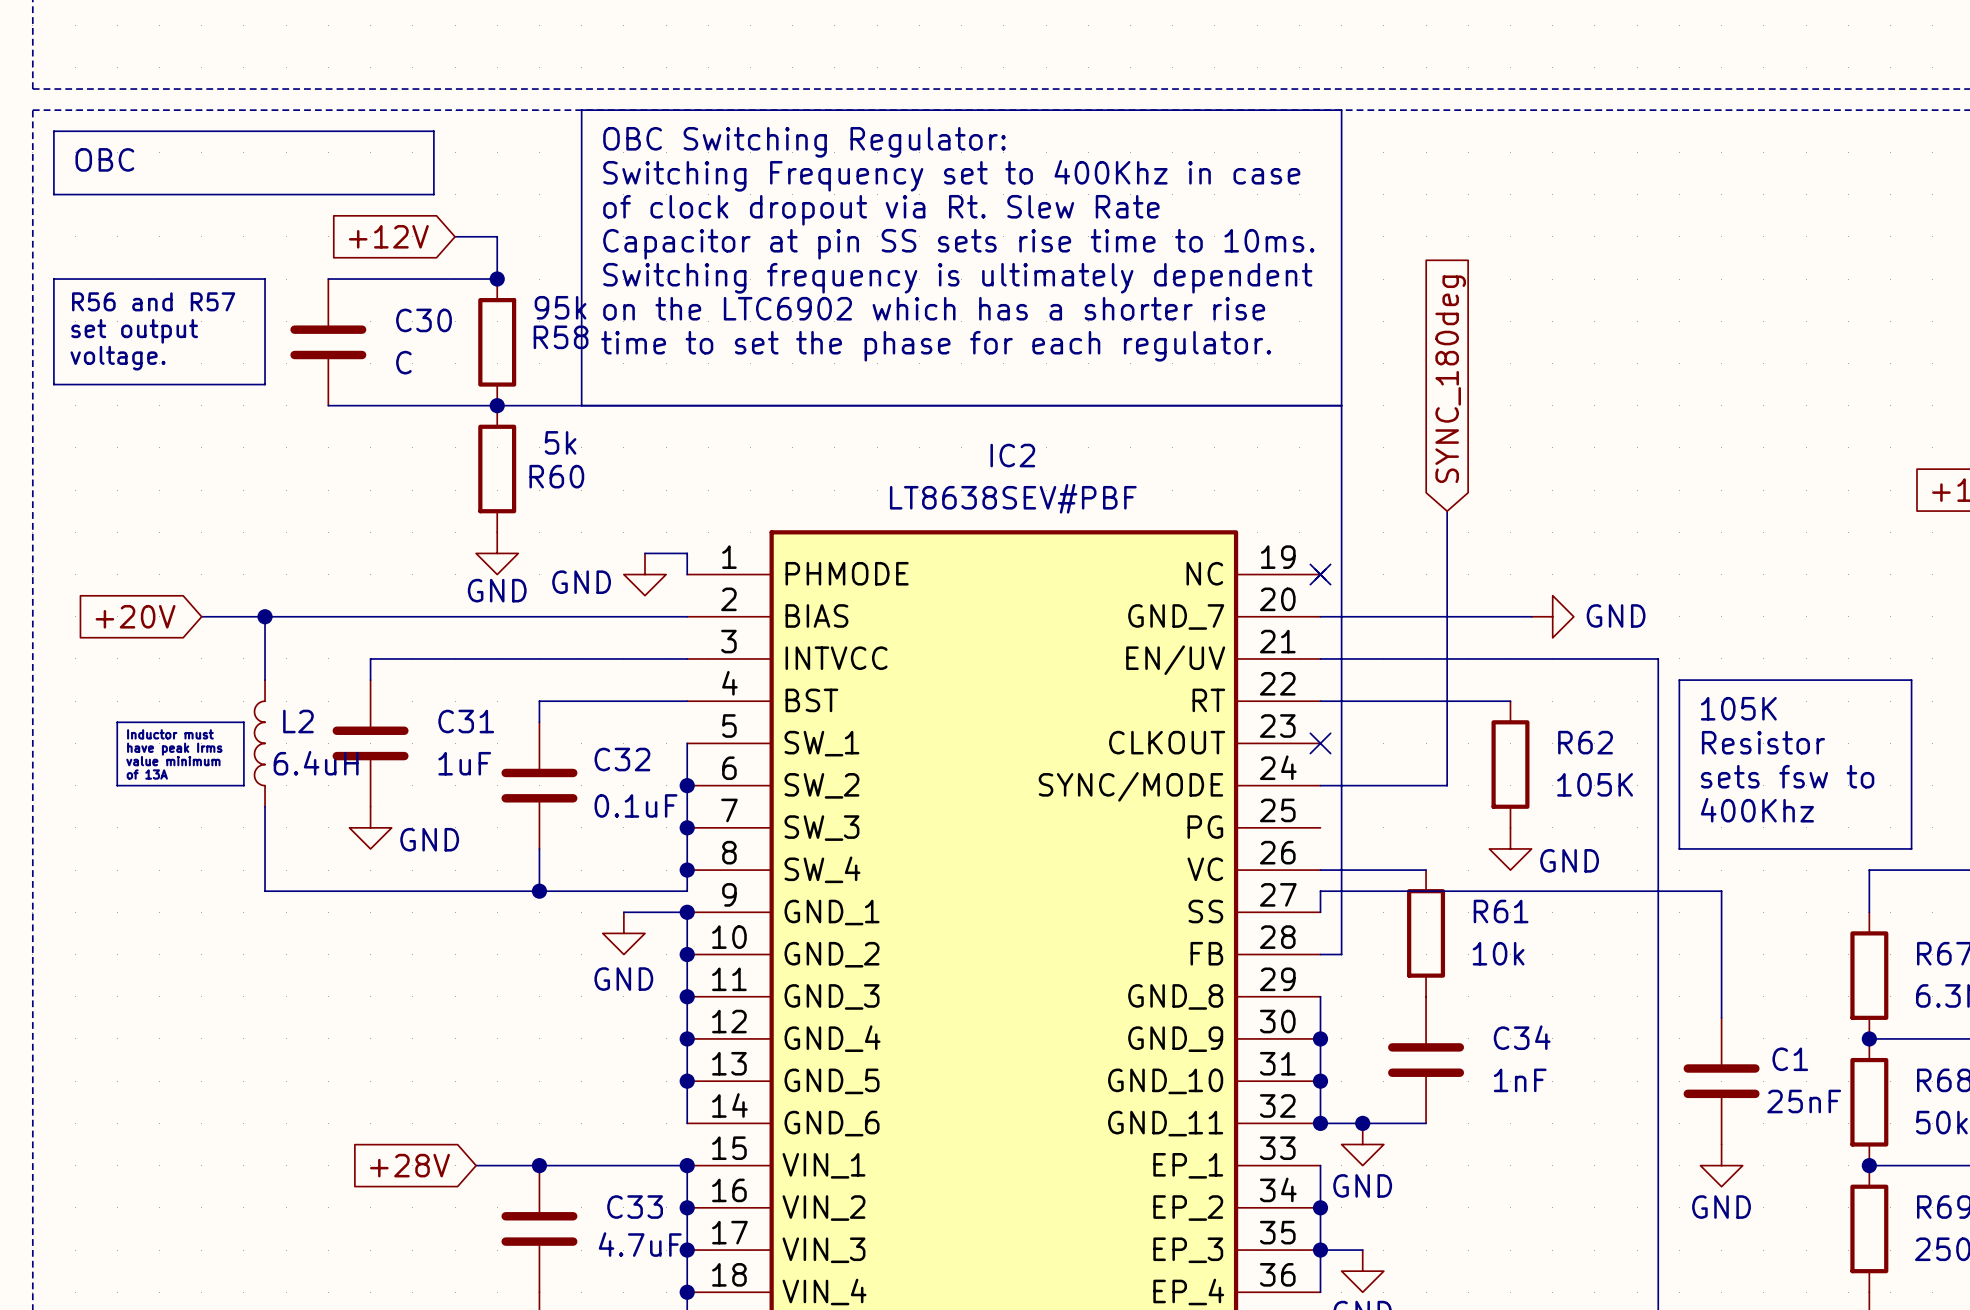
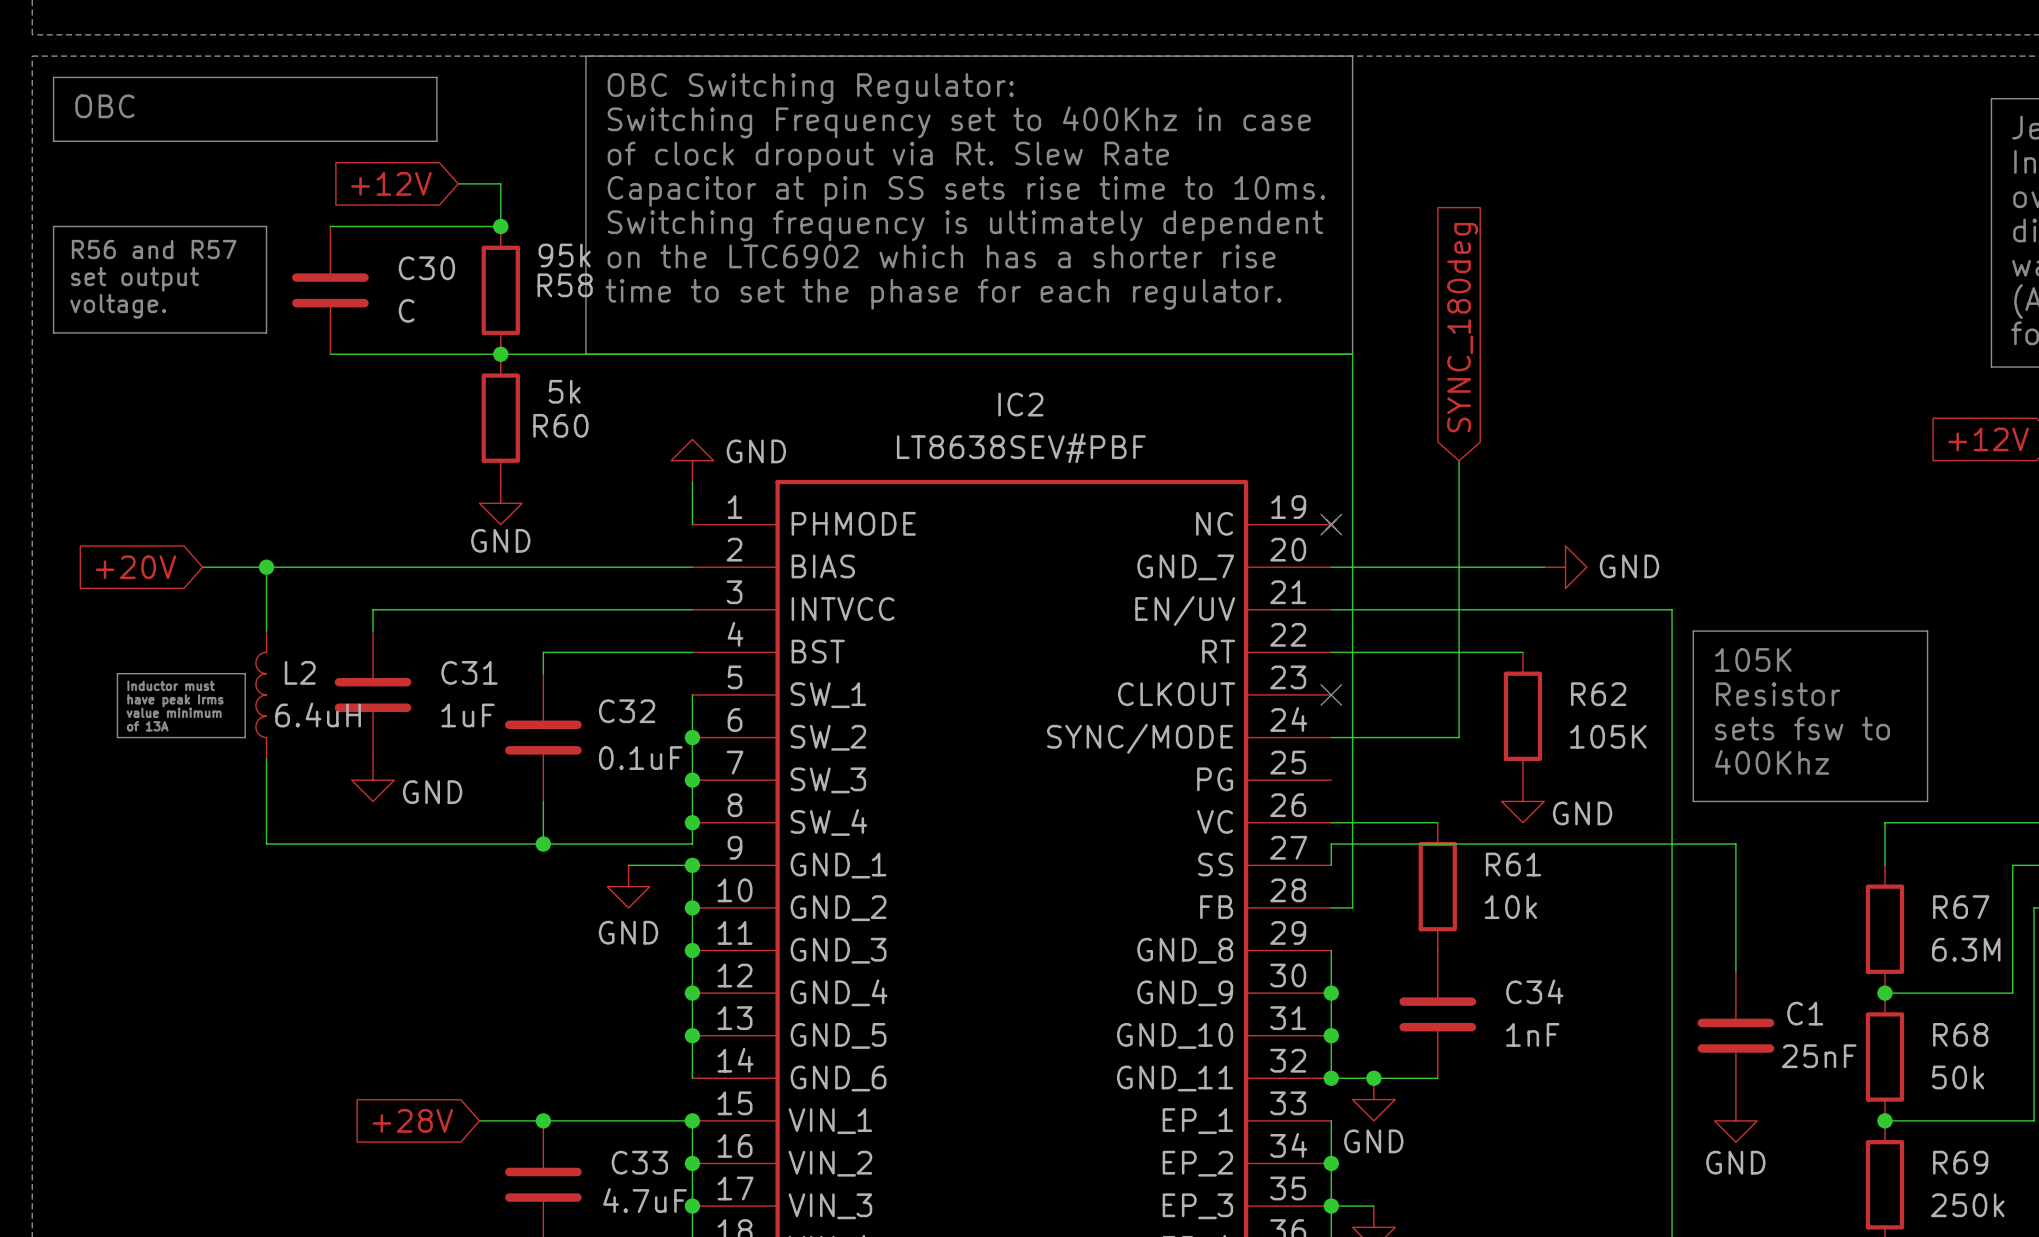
wire: (644, 553) (687, 553) -> (692, 482) (692, 503)
power symbol rotation: 0° (644, 574) -> 180° (692, 460)
power symbol position: GND (644, 574) -> GND (692, 460)

